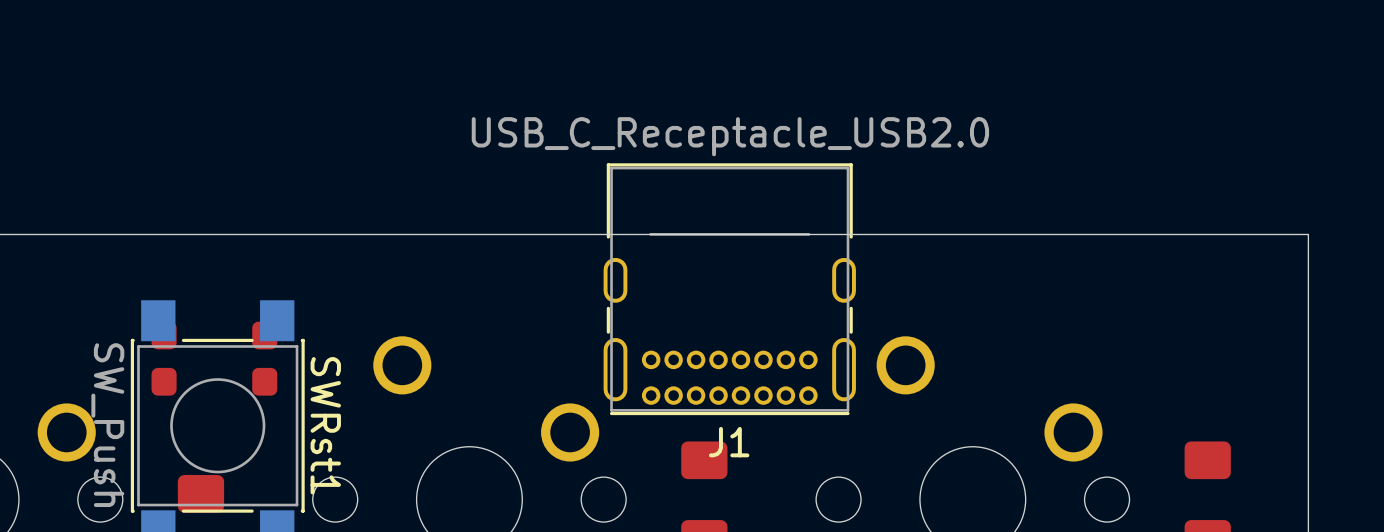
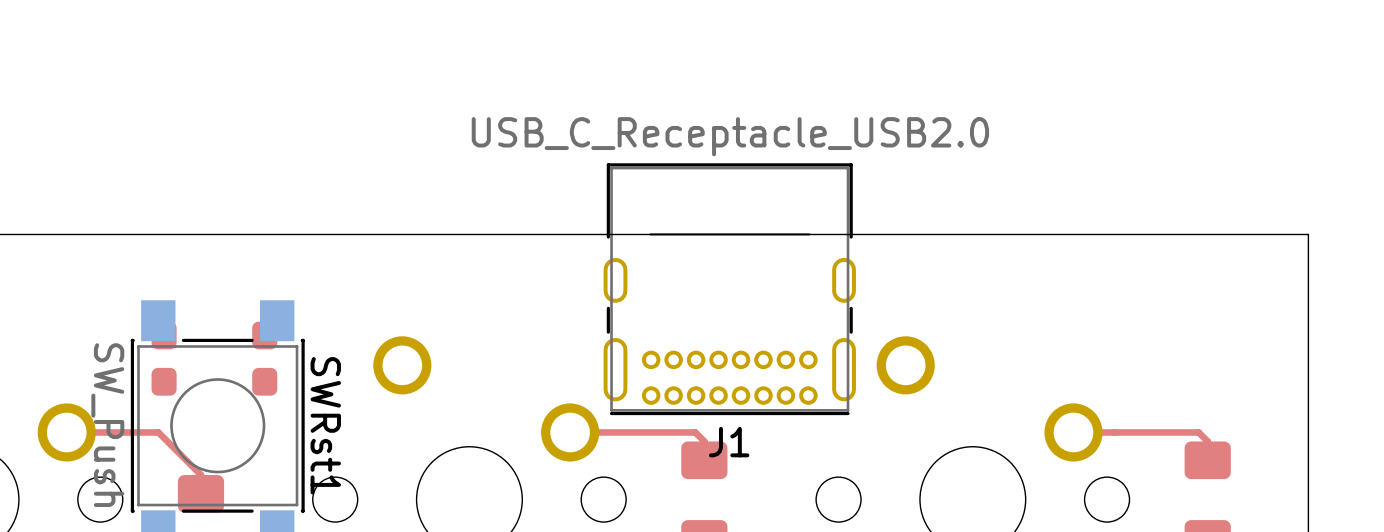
top track: none -> (66, 432) (158, 432) (200, 475) (200, 493)
top track: none -> (570, 432) (695, 432) (704, 441) (704, 460)
top track: none -> (1073, 432) (1198, 432) (1207, 441) (1207, 460)

